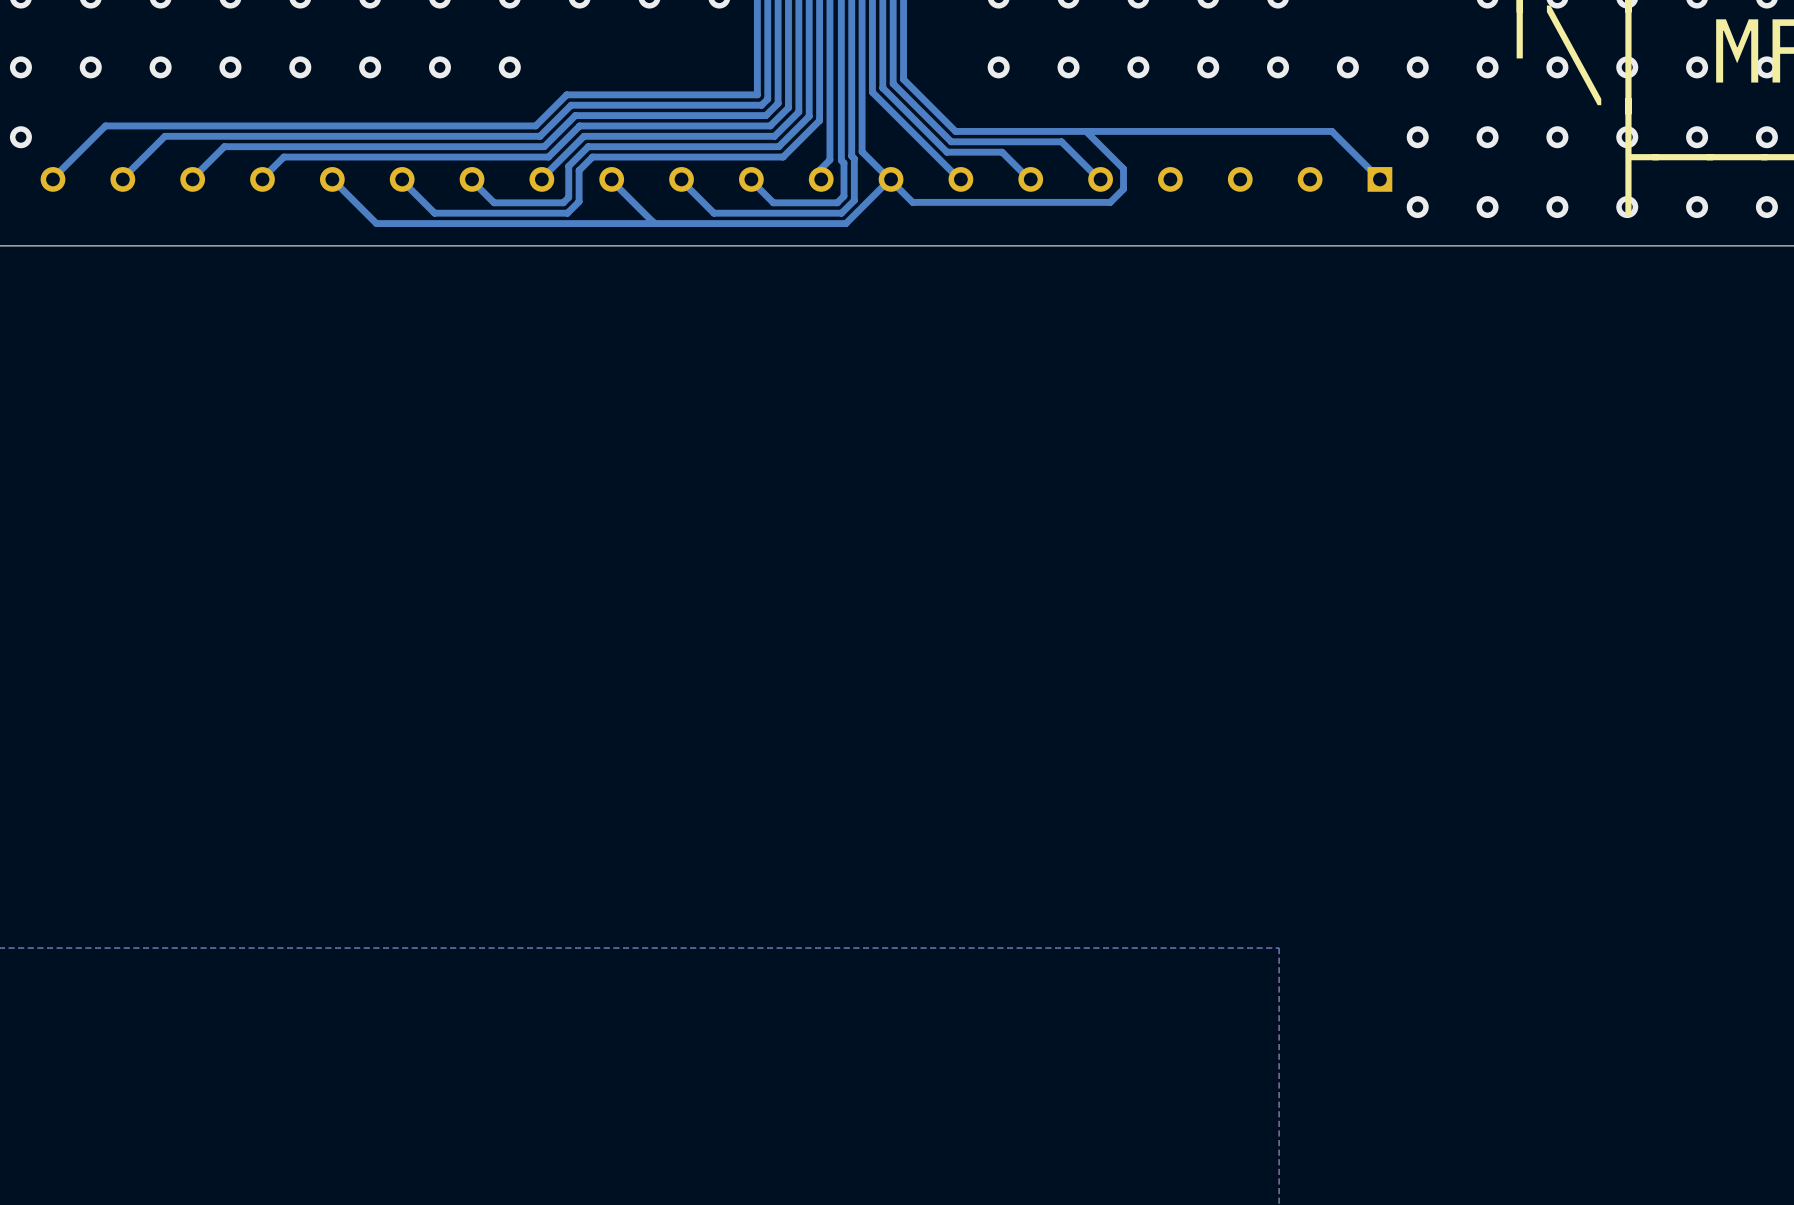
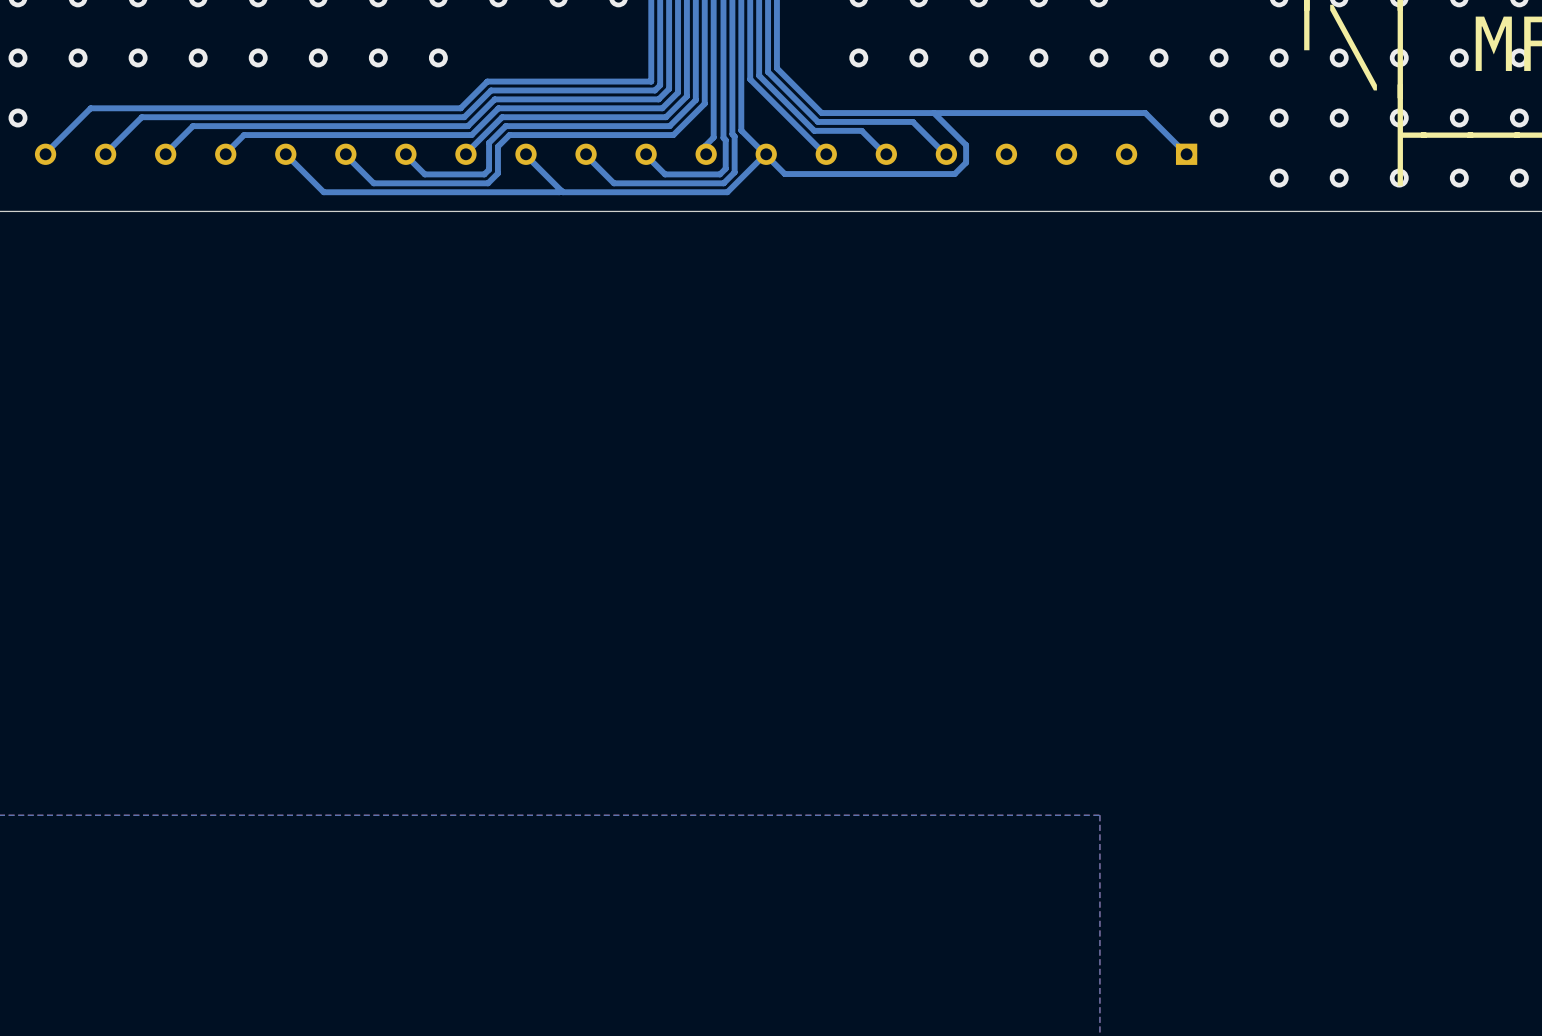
via: (1417, 207) -> none

